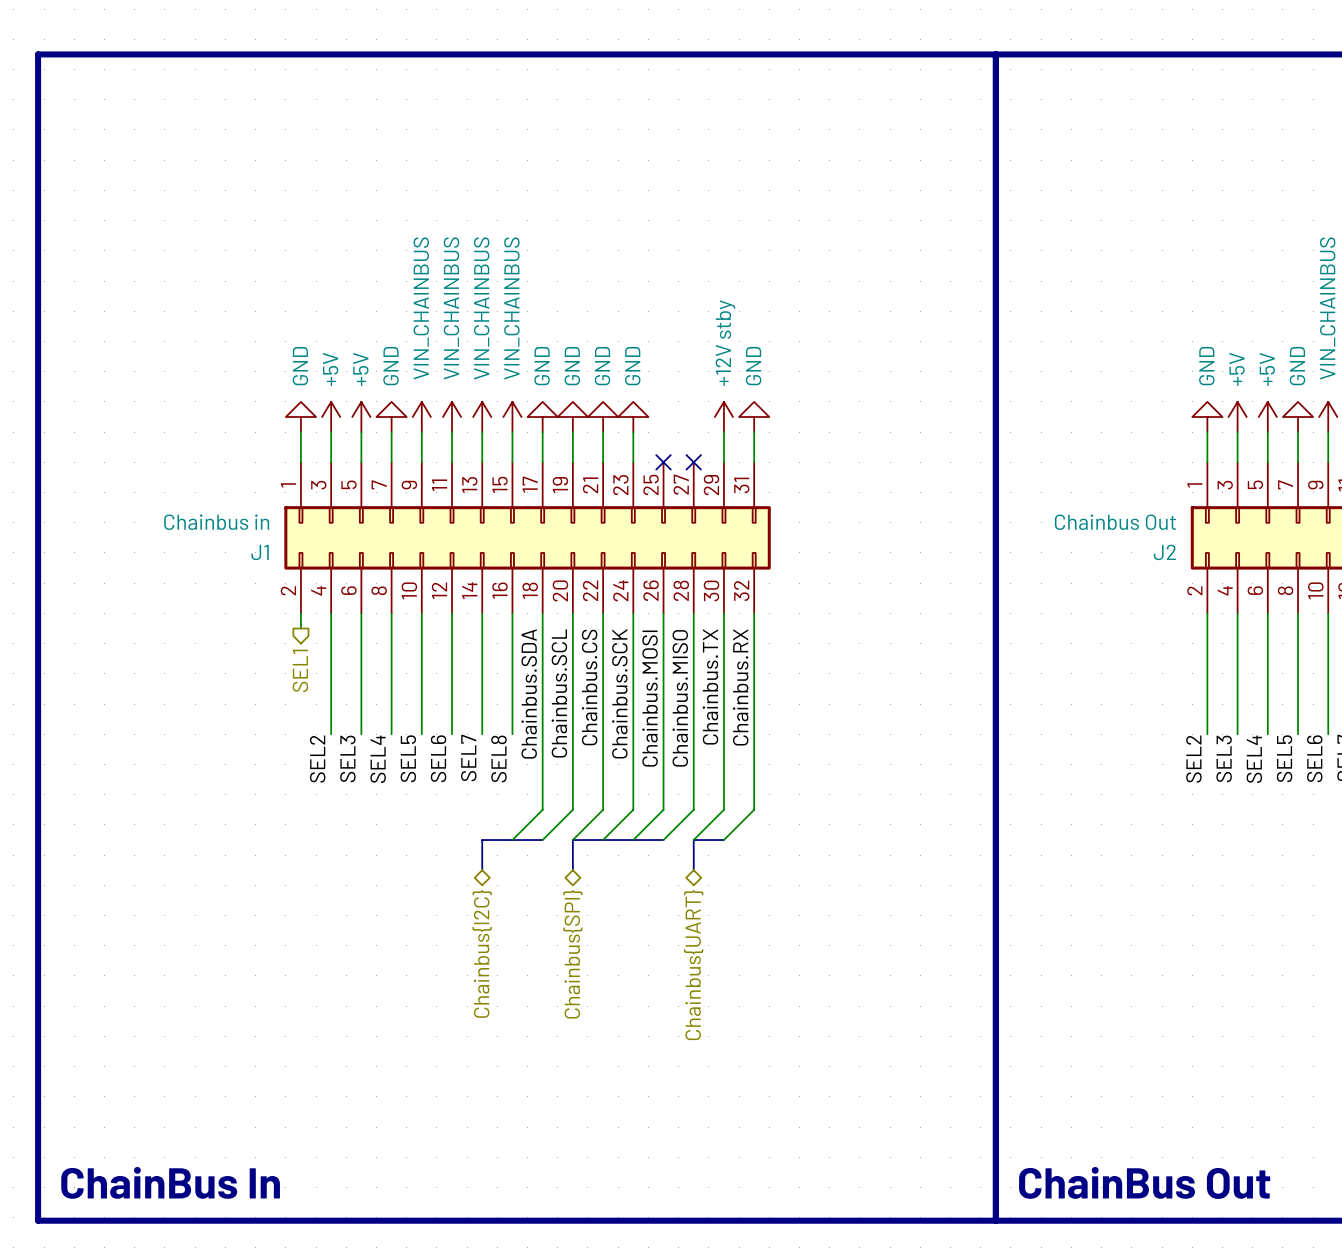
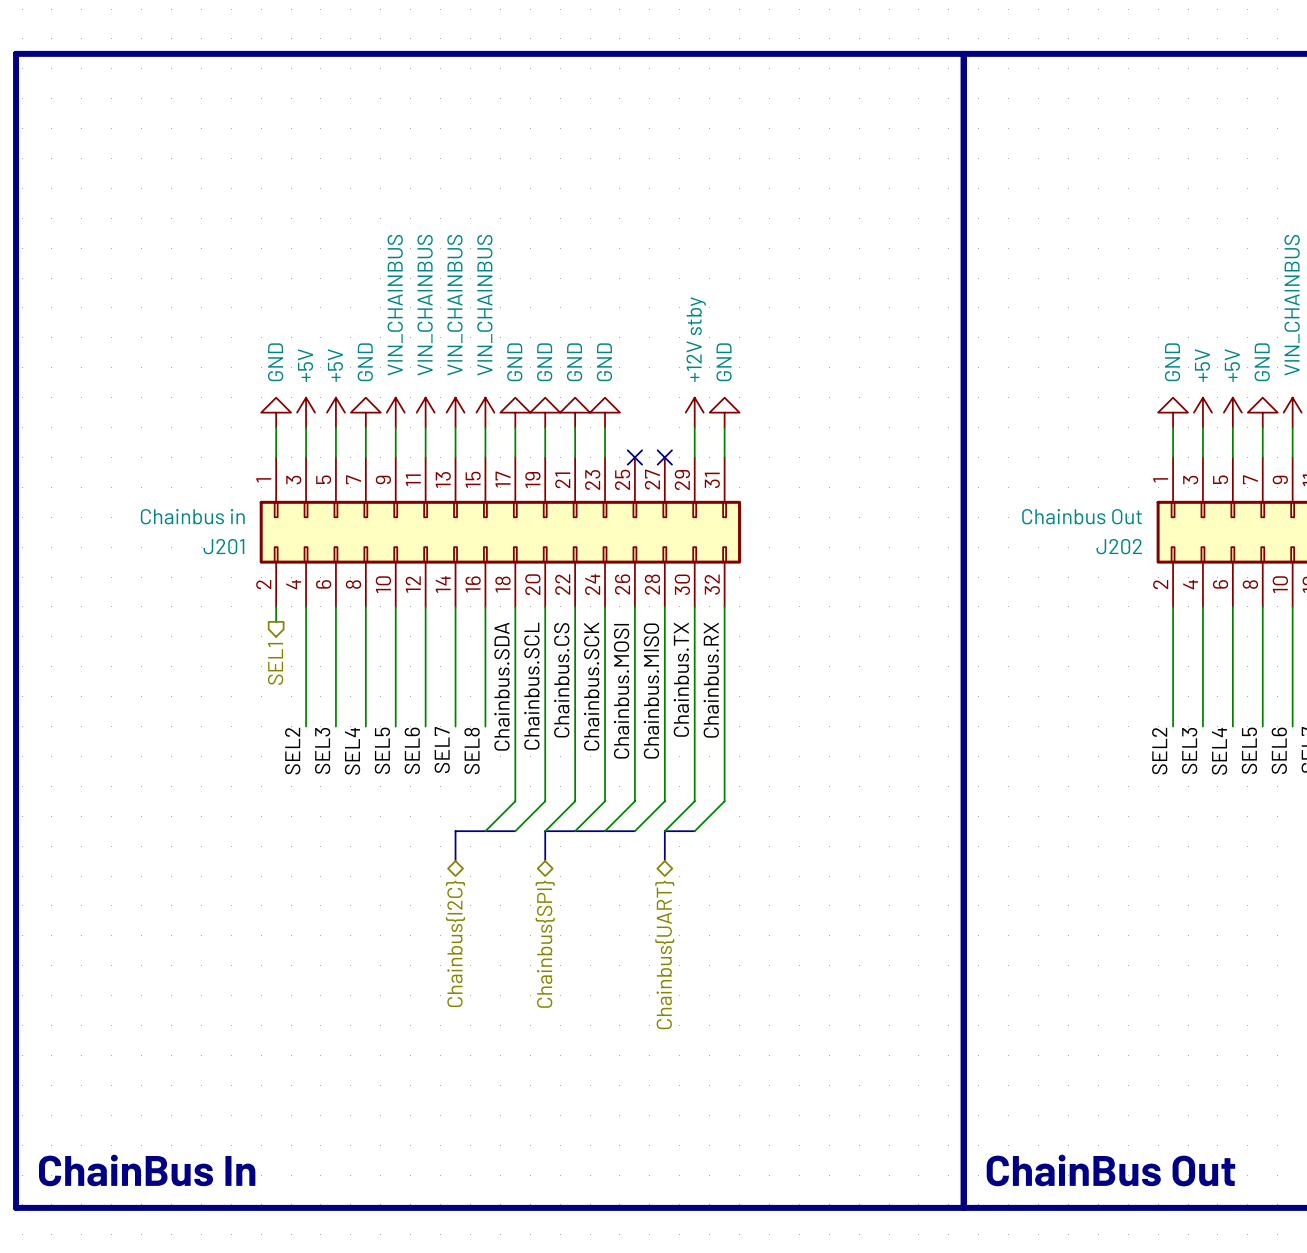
J1 name: J1 (260, 552) -> J201 (223, 546)
J2 name: J2 (1164, 552) -> J202 (1119, 546)

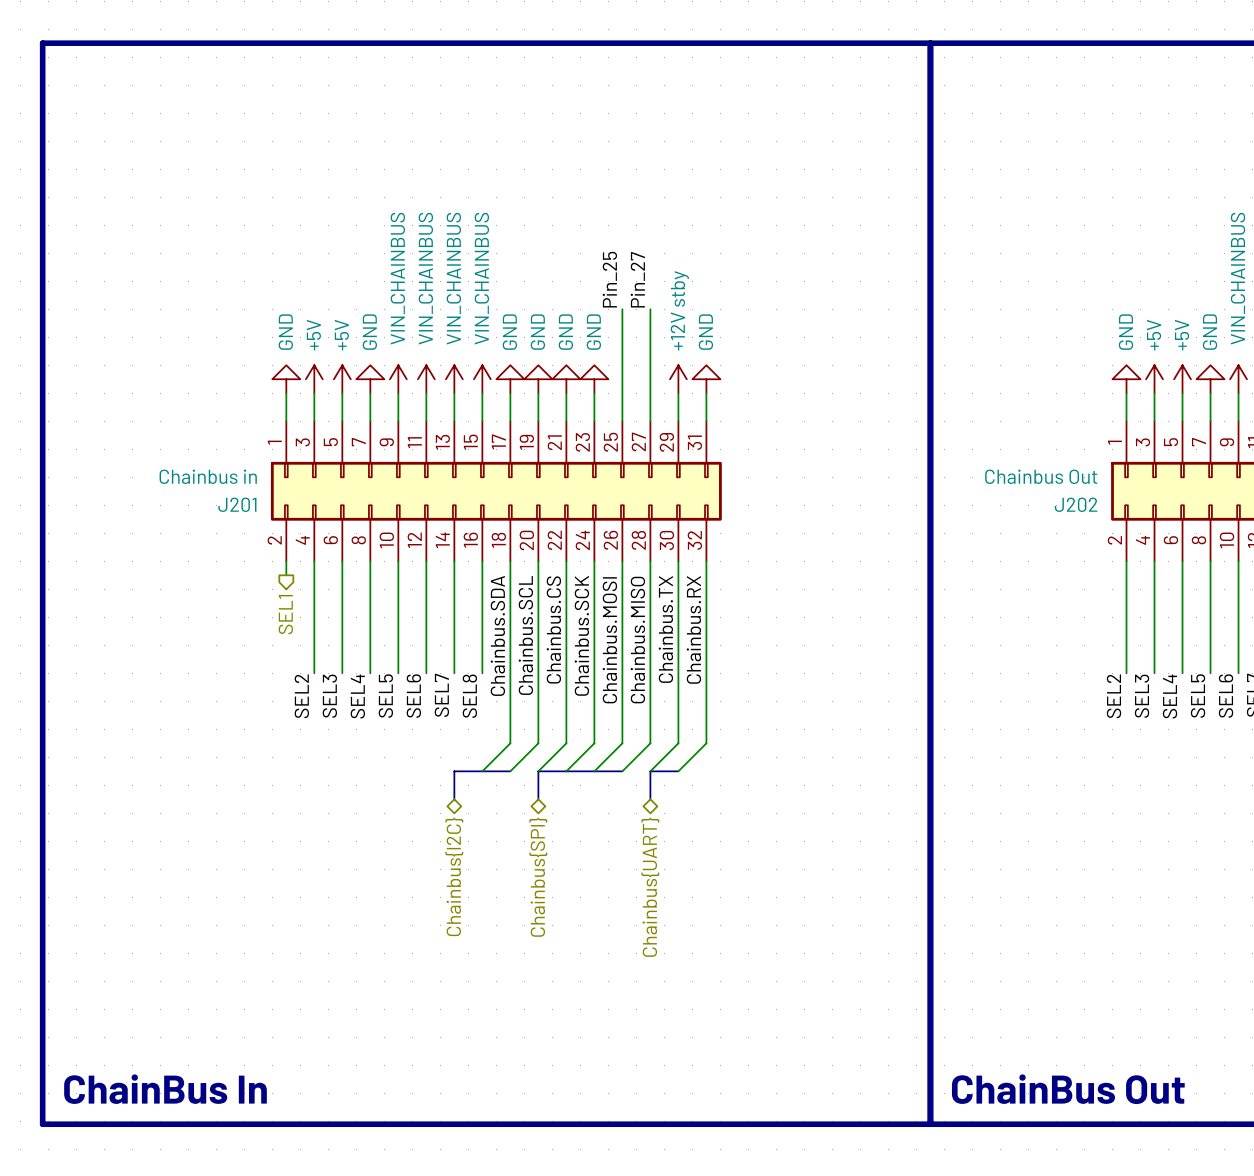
label: none -> Pin_25 (609, 279)
label: none -> Pin_27 (637, 279)
wire: none -> (622, 309) (622, 421)
wire: none -> (650, 309) (650, 421)
no-connect mark: (634, 457) -> none
no-connect mark: (664, 457) -> none

